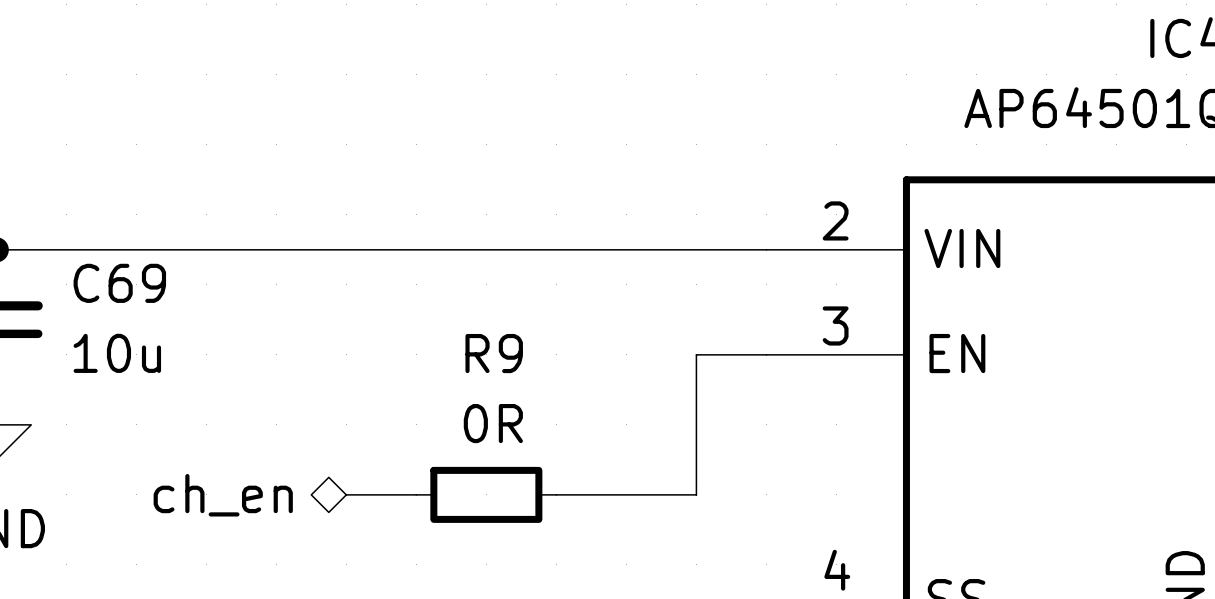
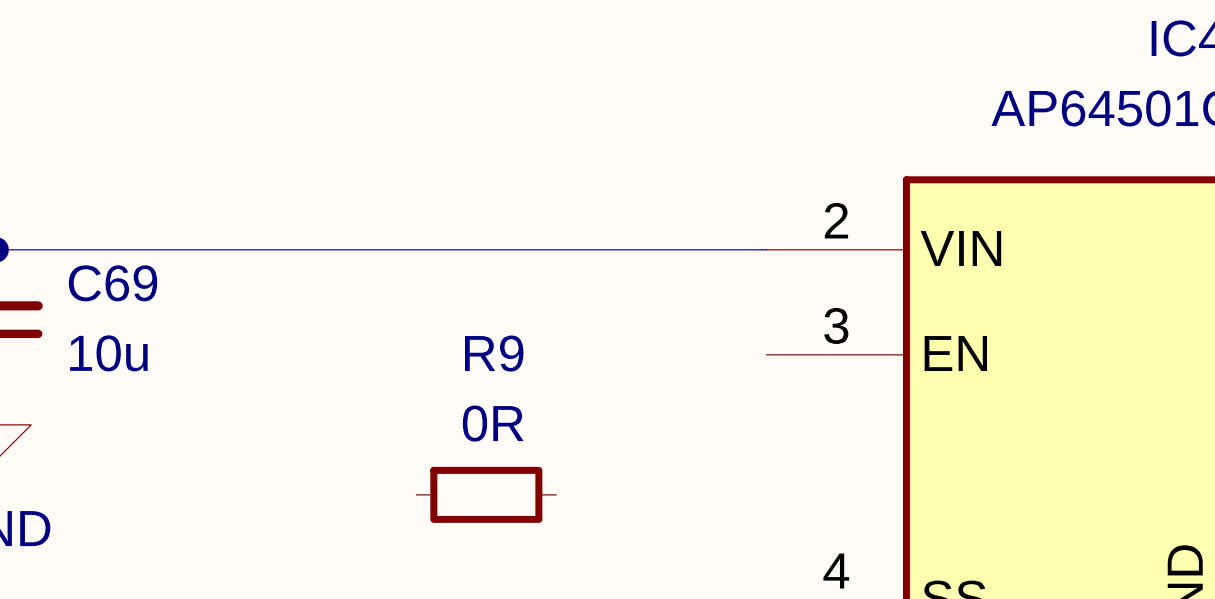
wire: (766, 354) (696, 354) (696, 494) (556, 494) -> none
wire: (346, 494) (416, 494) -> none
hierarchical label: ch_en (223, 495) -> none

